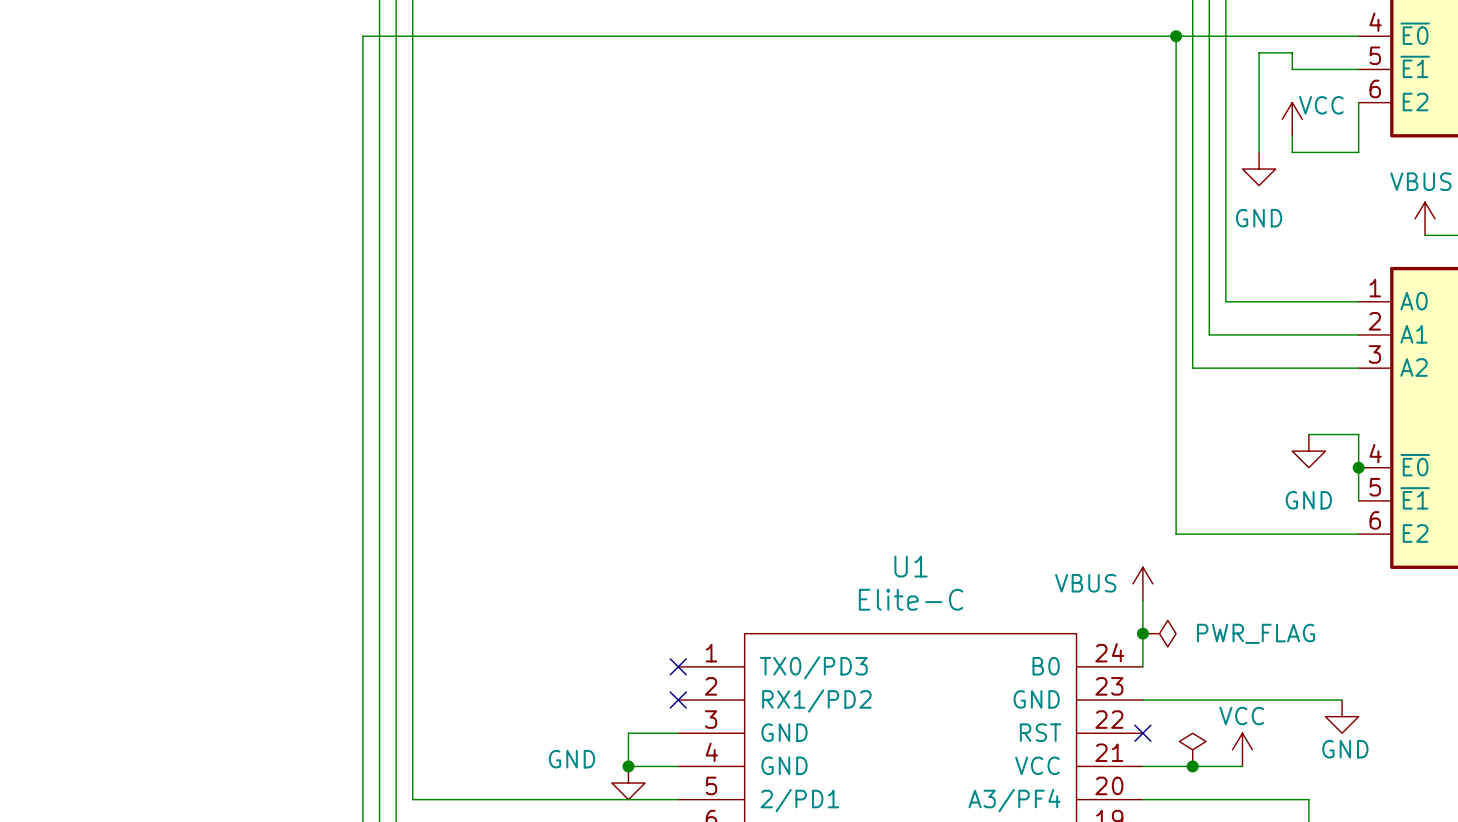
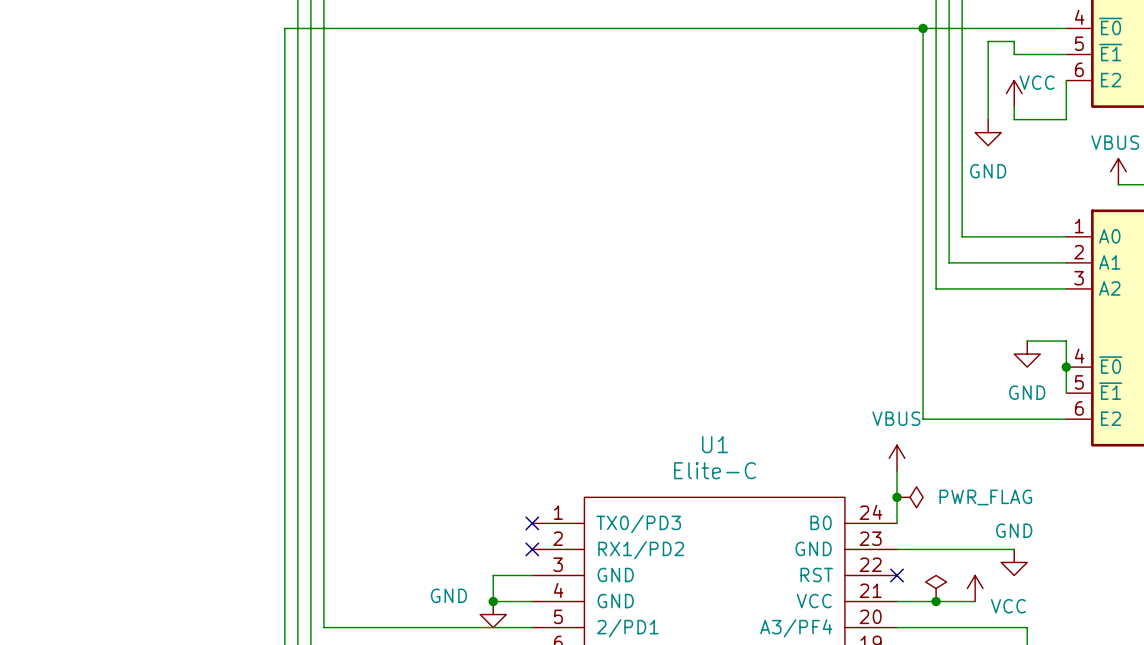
power symbol text position: VBUS (1085, 583) -> VBUS (896, 418)
wire: (1292, 700) (1342, 700) -> none
power symbol text position: VCC (1241, 716) -> VCC (1008, 606)
power symbol position: GND (1342, 716) -> GND (1014, 562)
power symbol text position: GND (1345, 749) -> GND (1014, 530)

